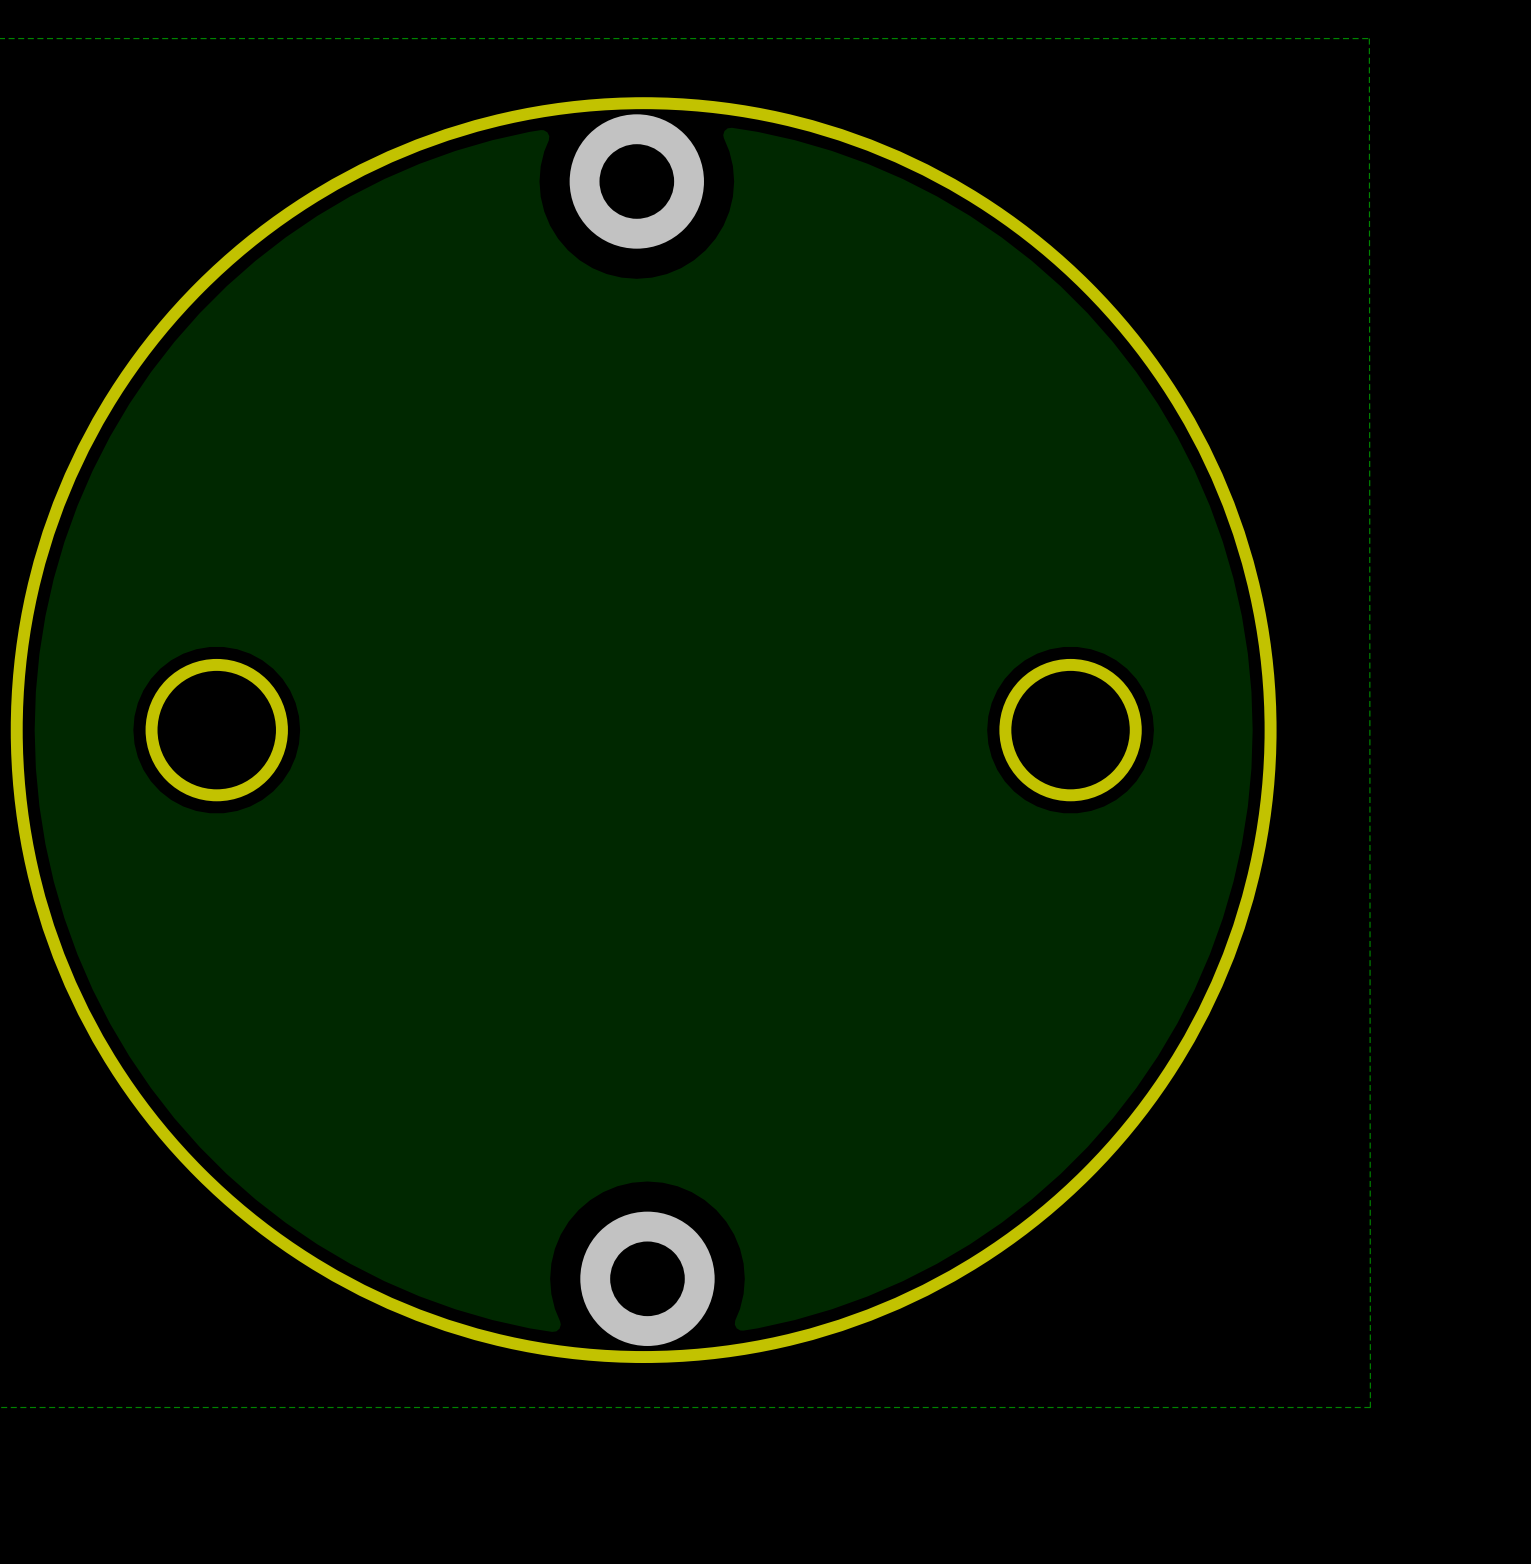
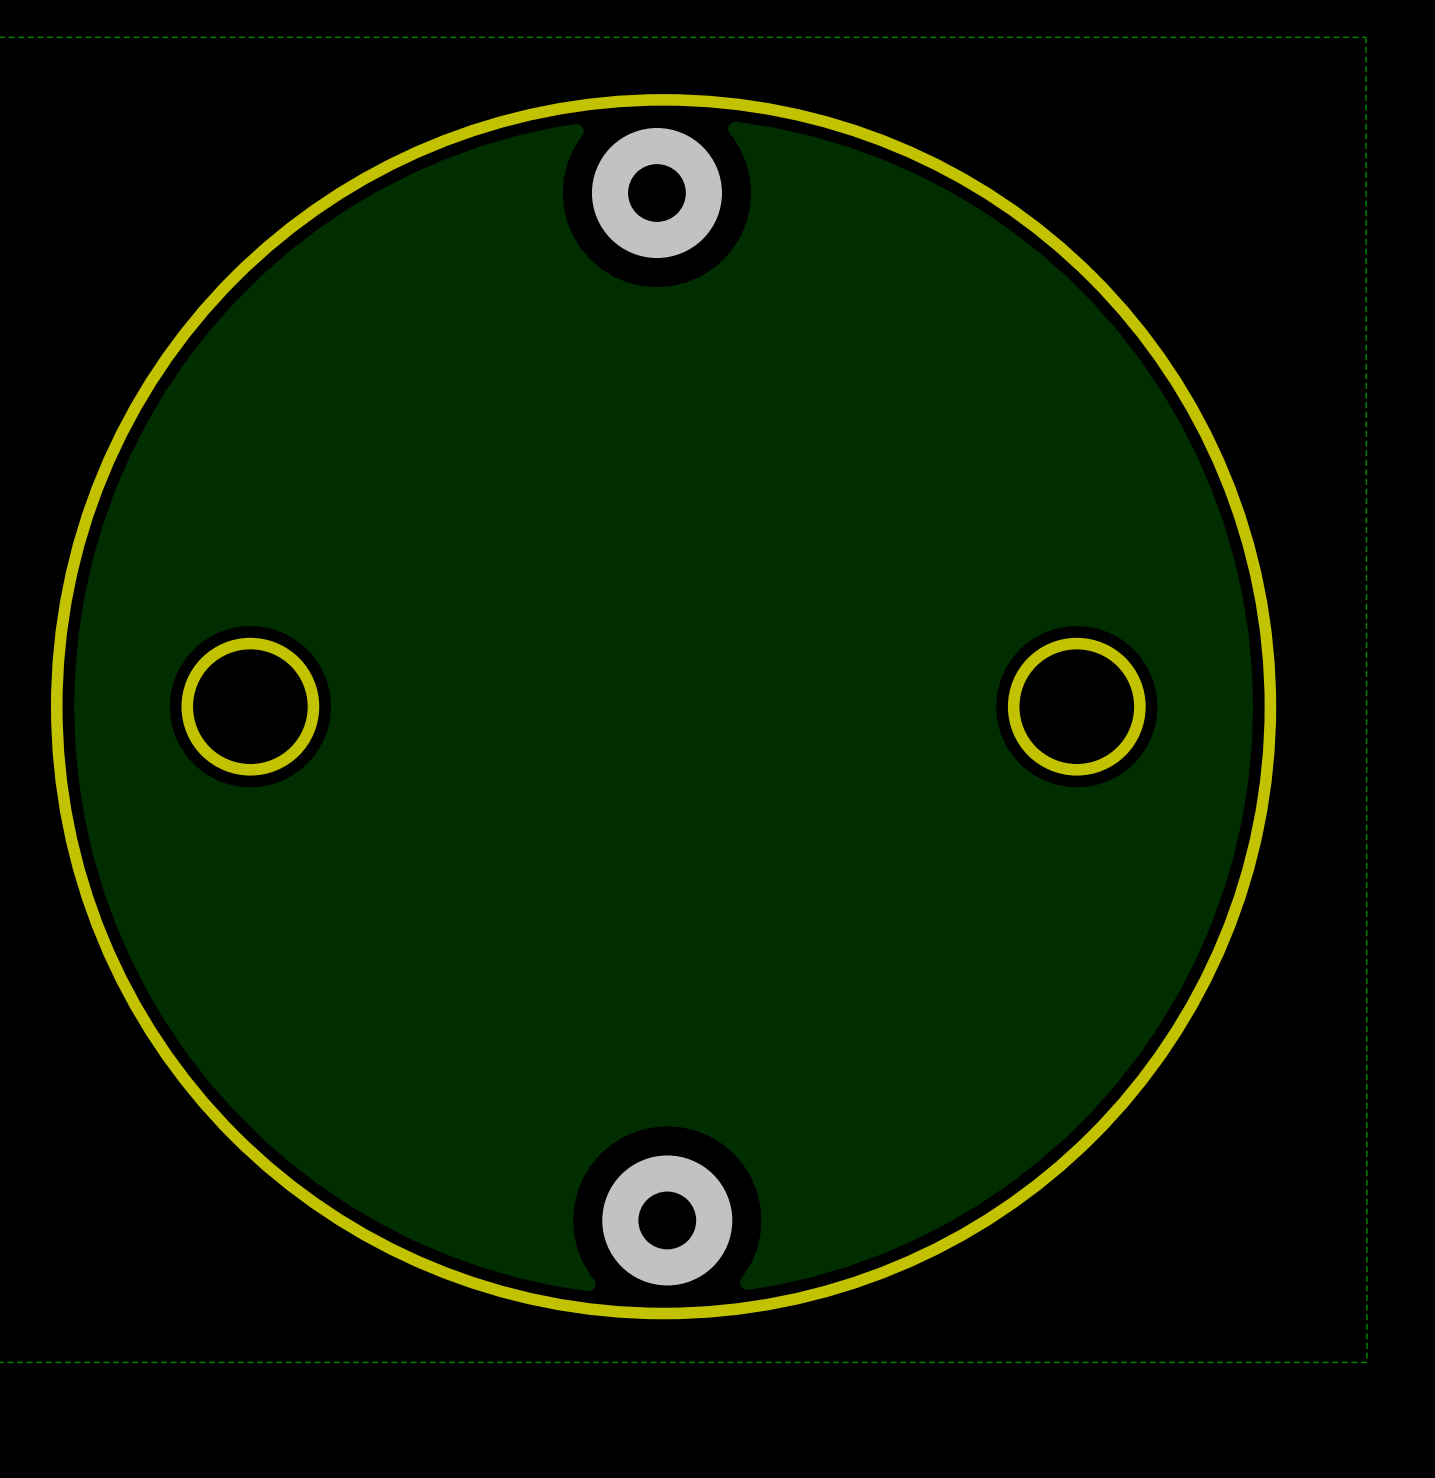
via position: (636, 181) -> (656, 193)
via position: (647, 1278) -> (667, 1220)

